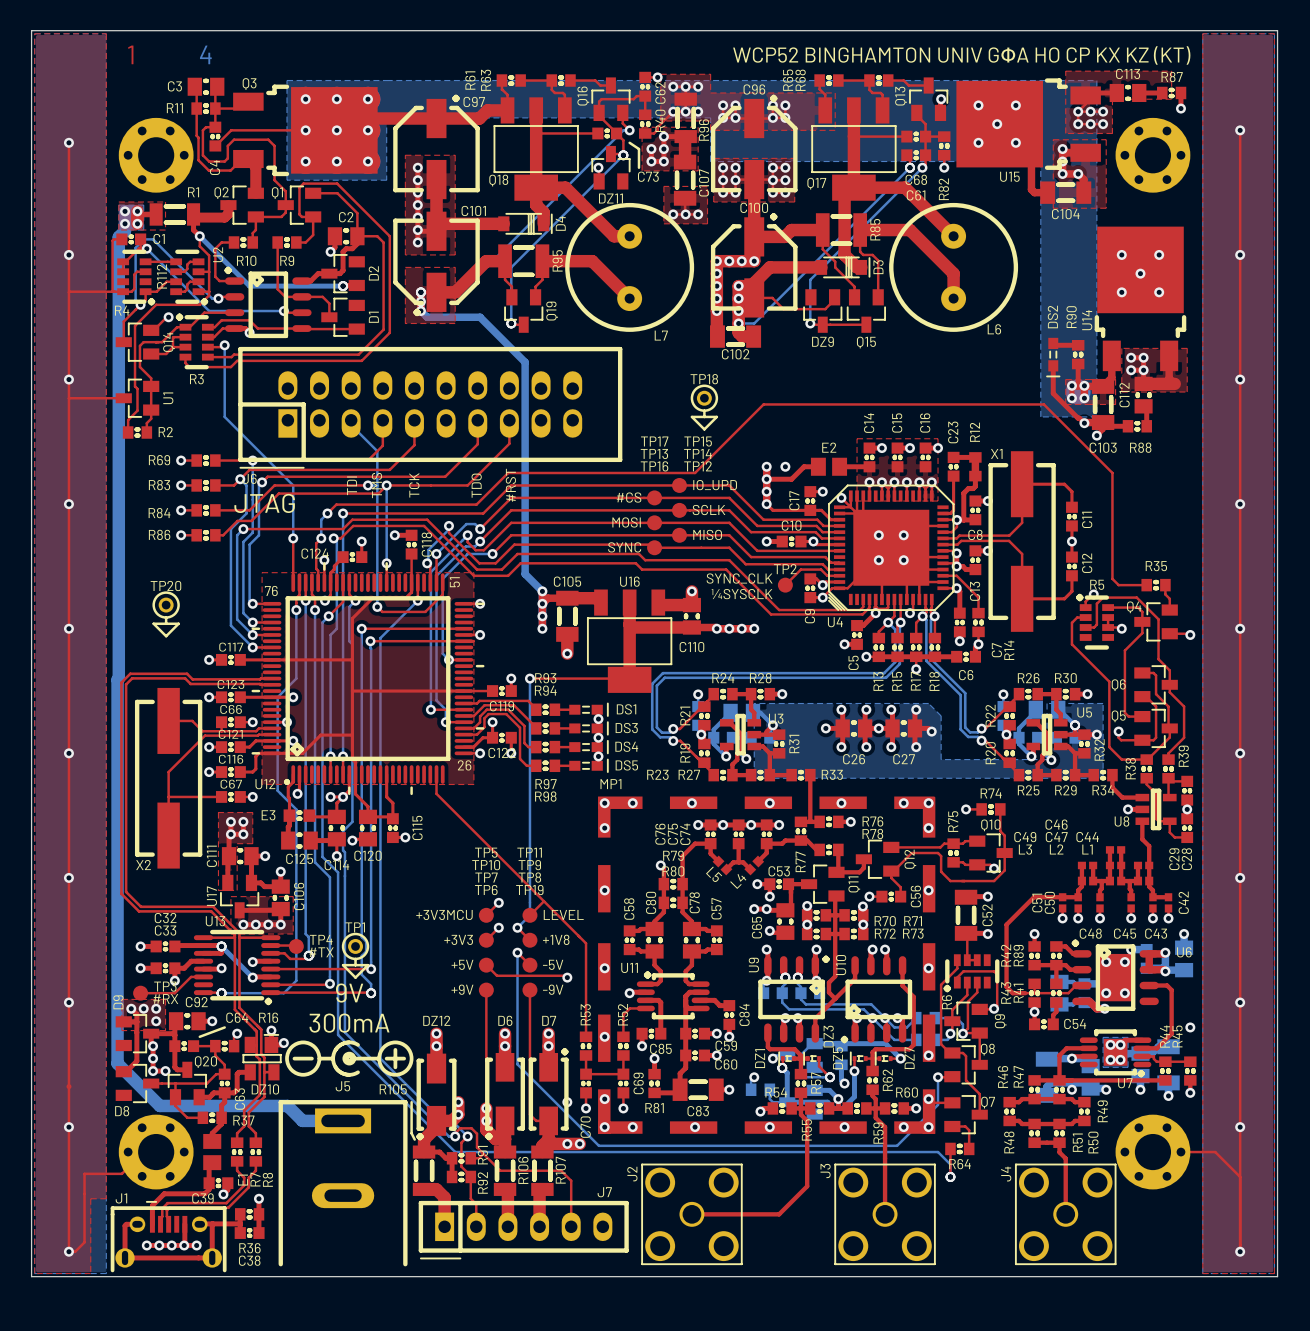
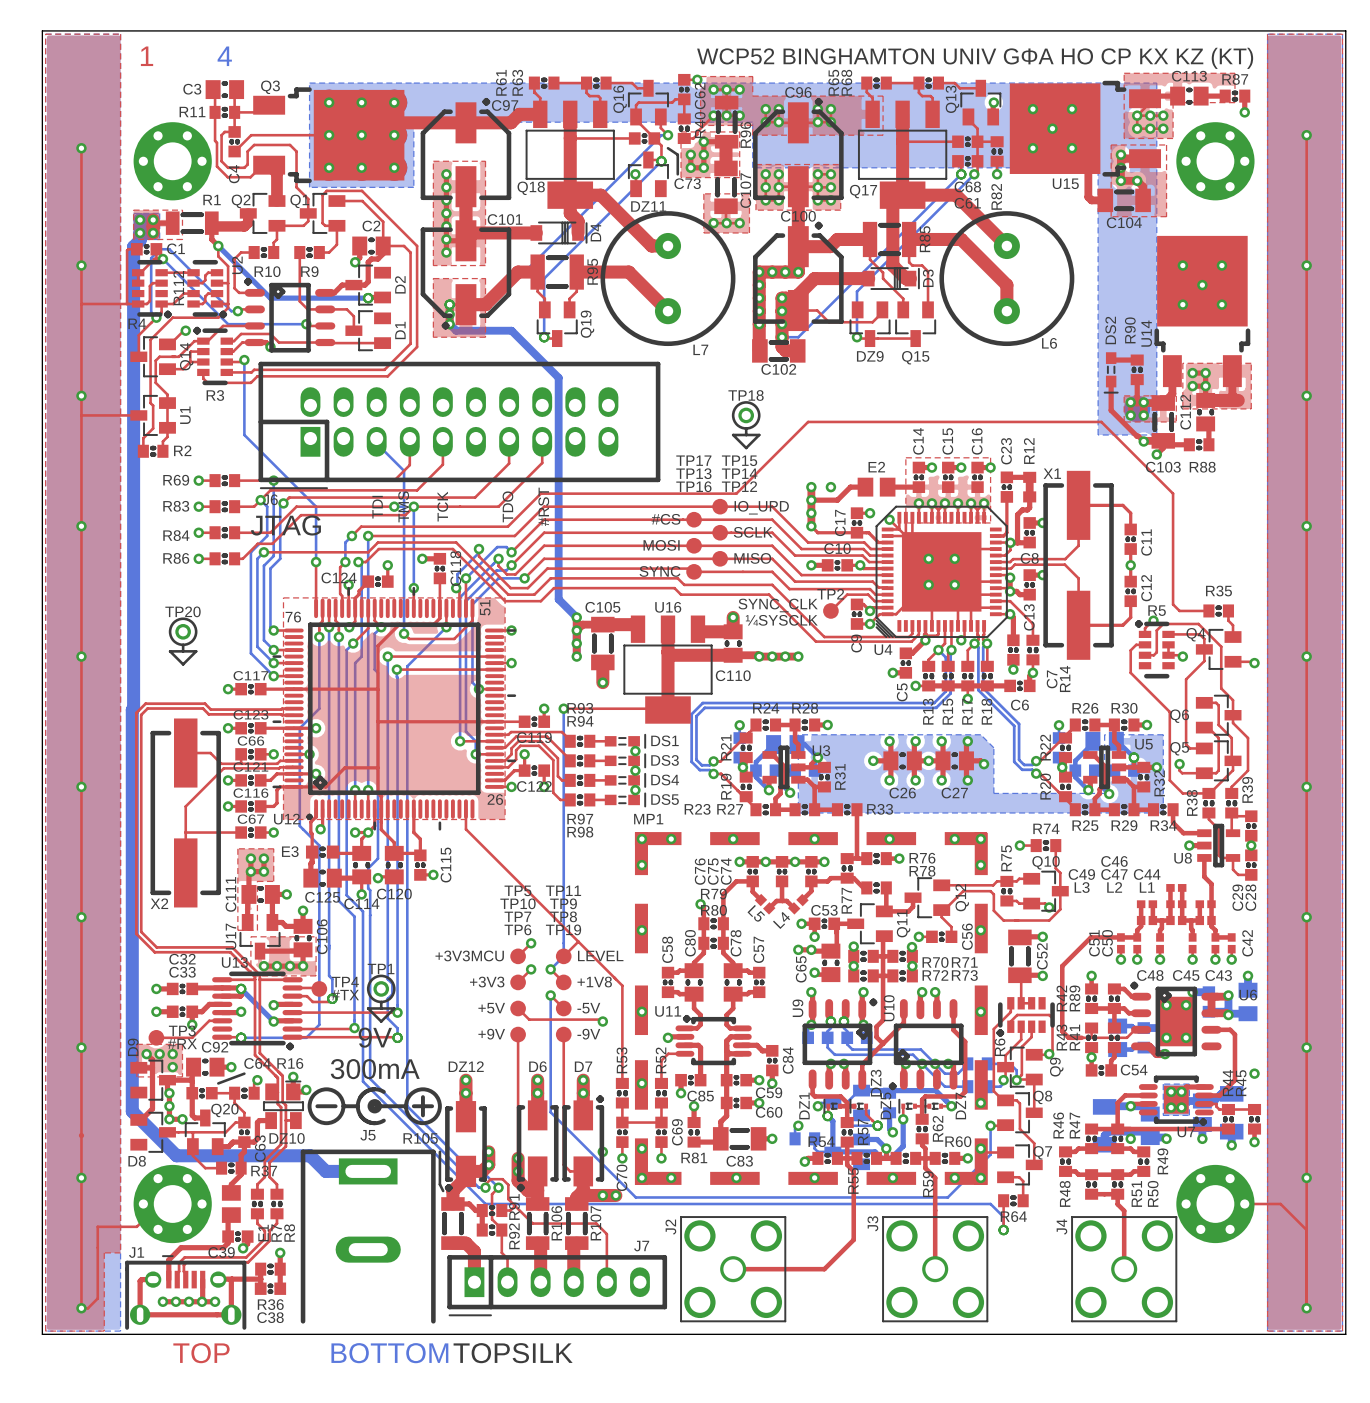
text: none -> TOP (201, 1353)
text: none -> BOTTOM (389, 1353)
text: none -> TOPSILK (513, 1353)

